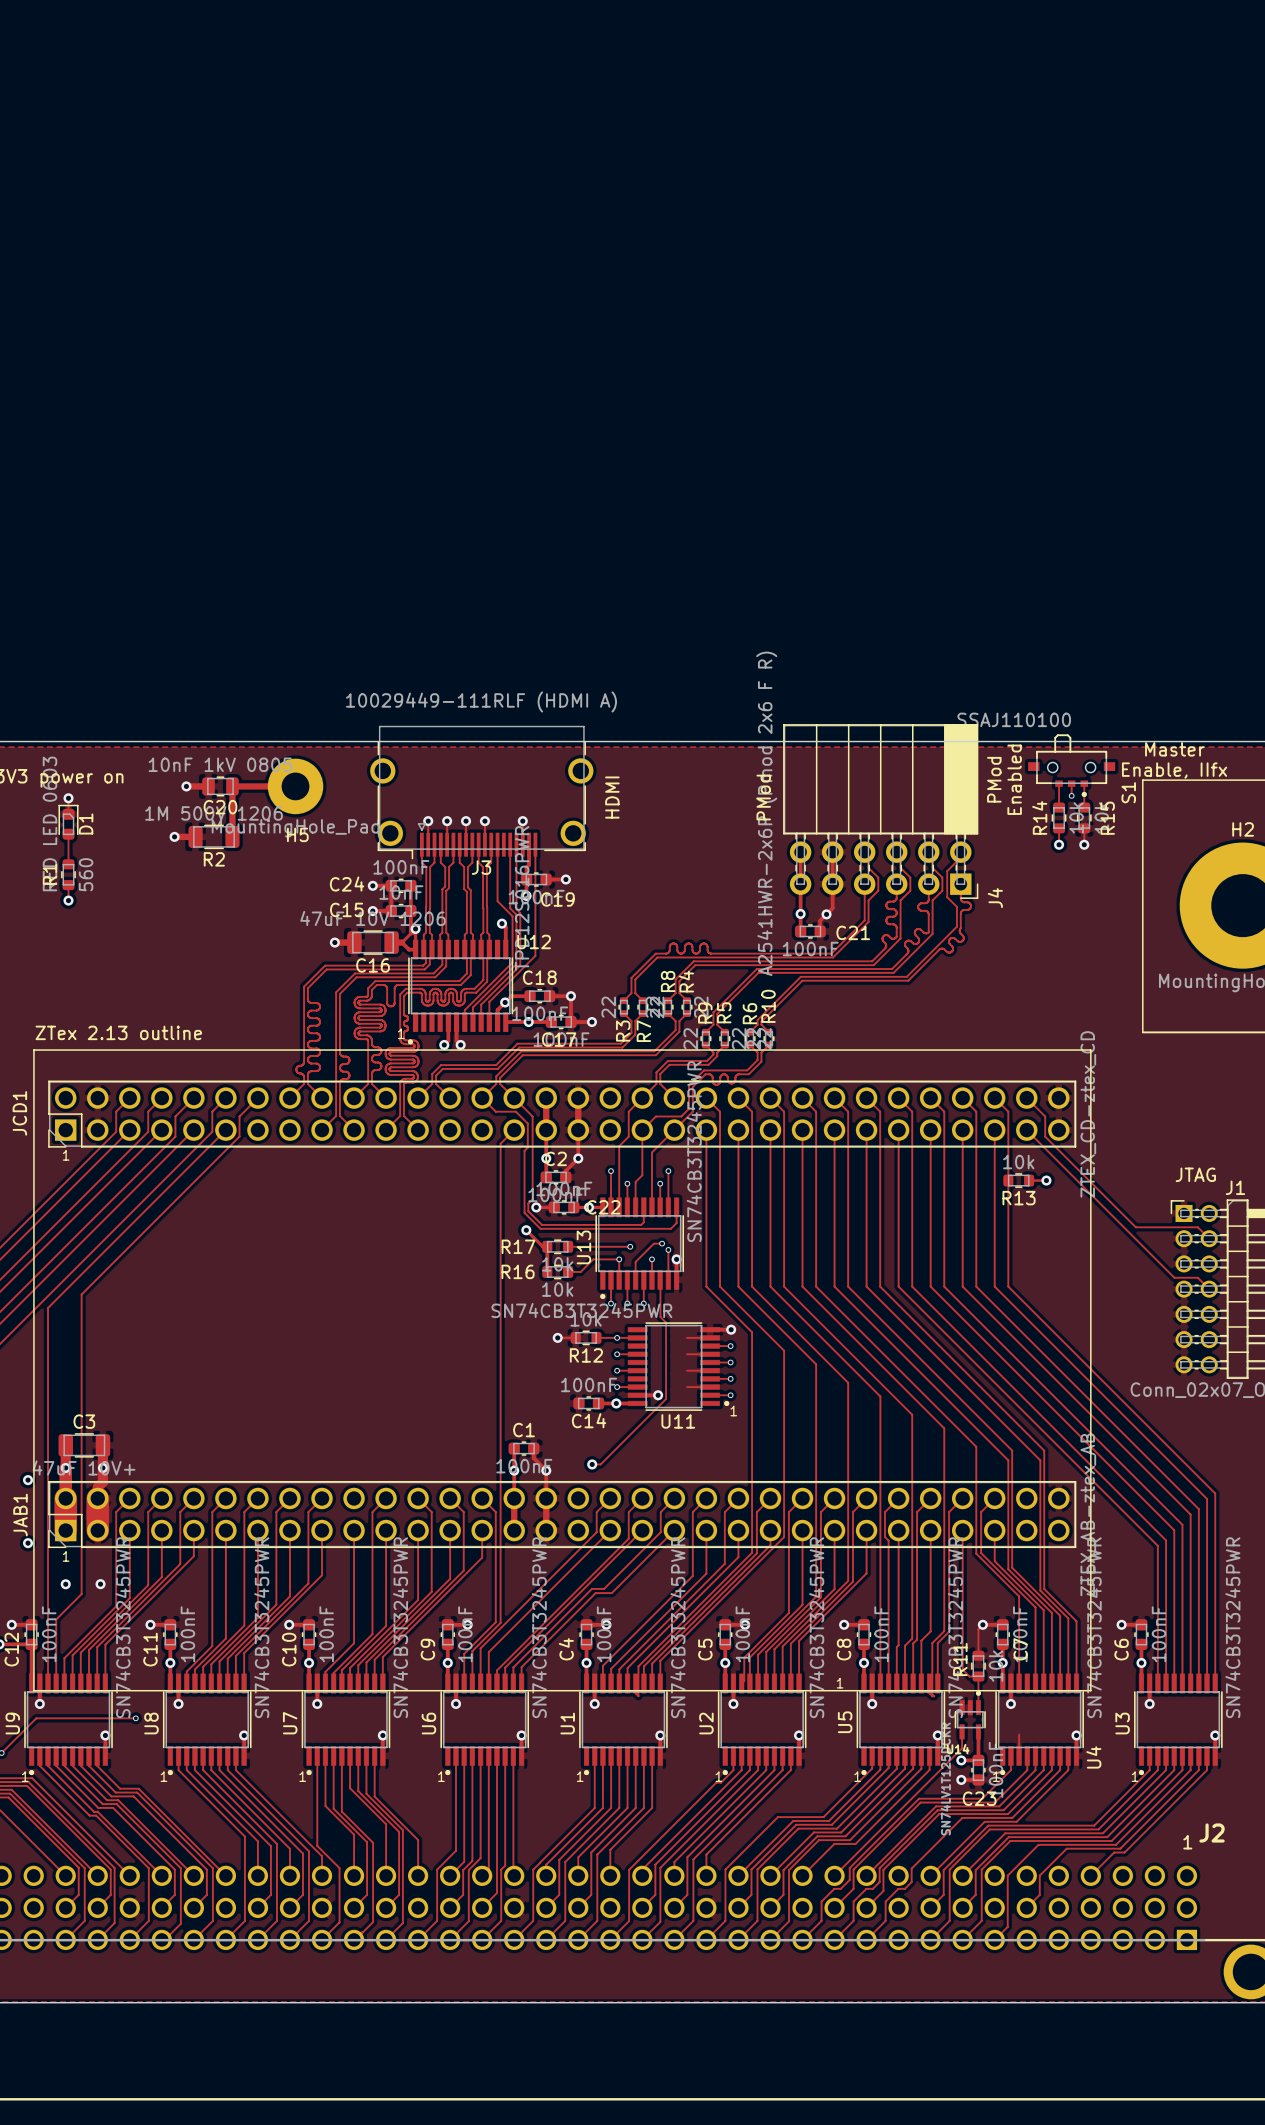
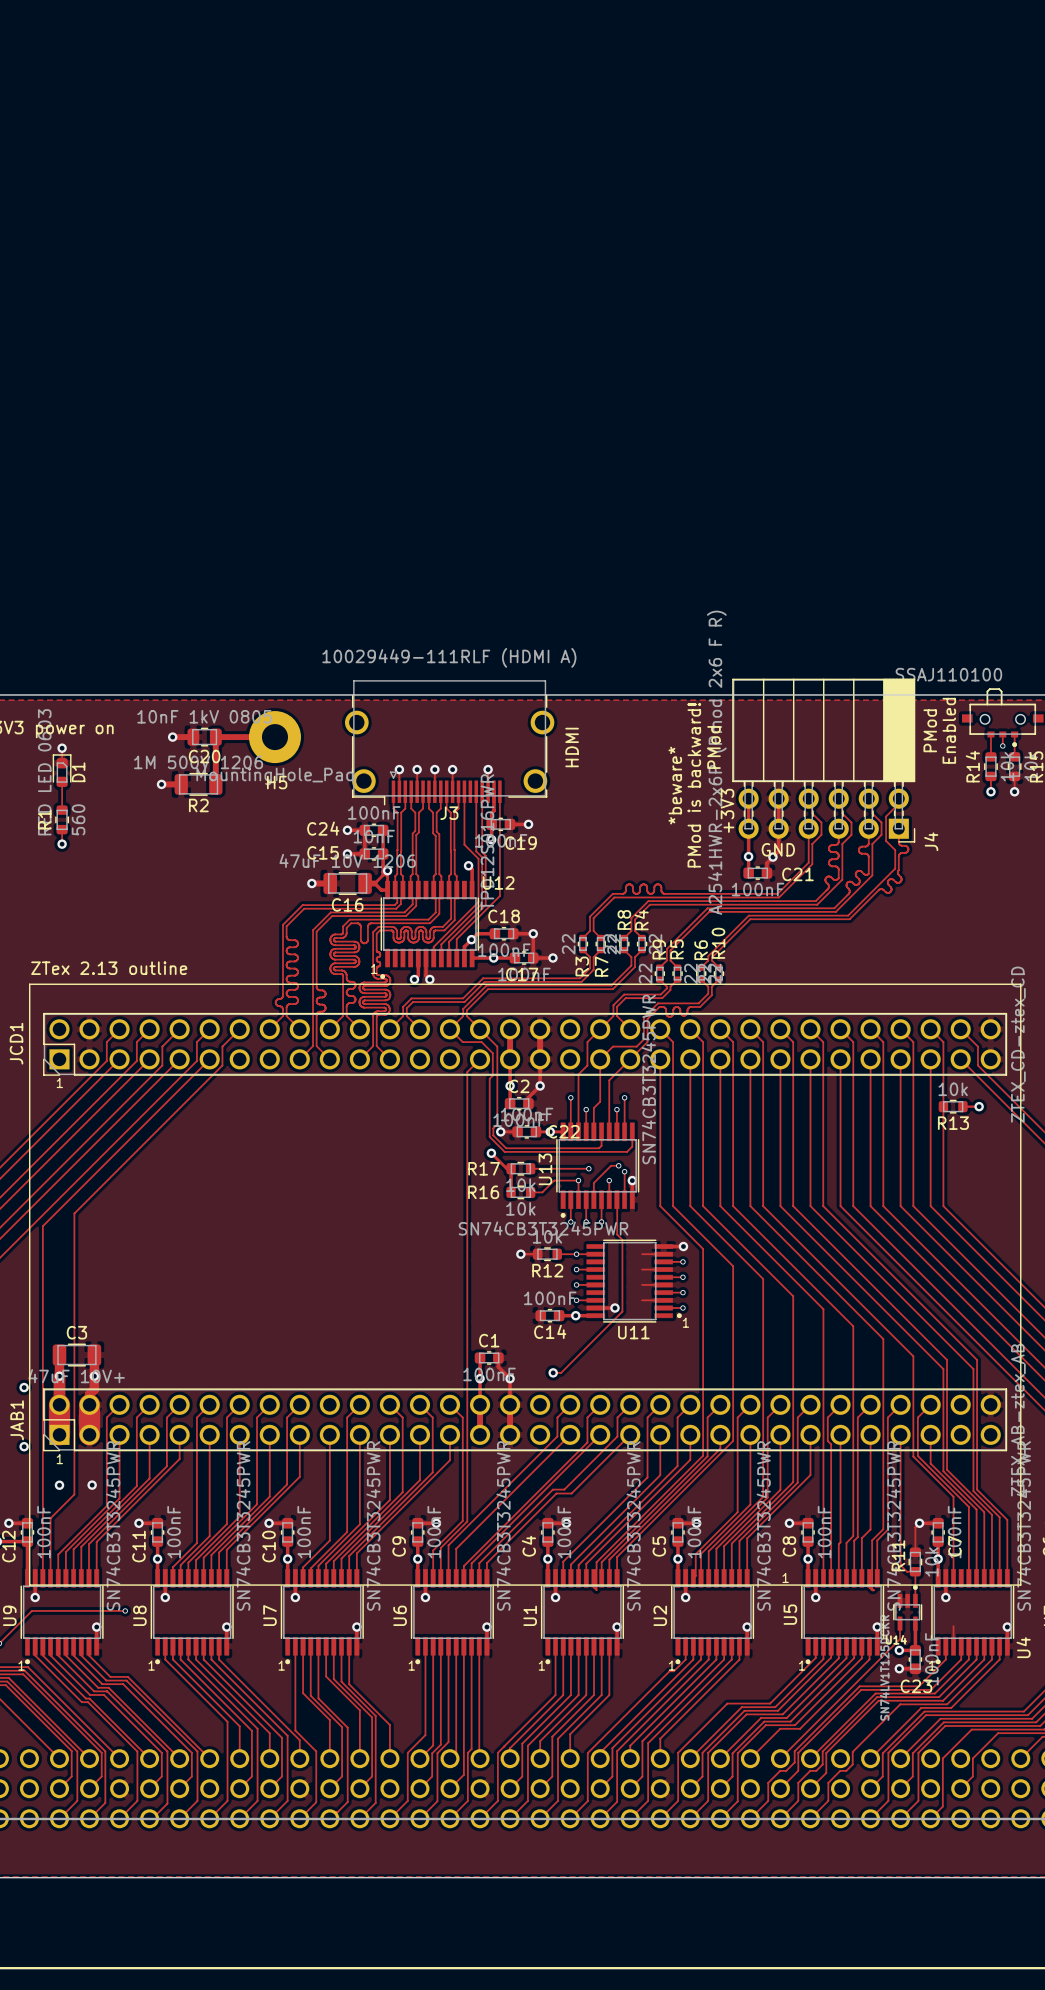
text: none -> PMod is backward! (694, 785)
text: none -> *beware* (675, 785)
text: none -> +3V3 (727, 810)
text: none -> GND (778, 849)

